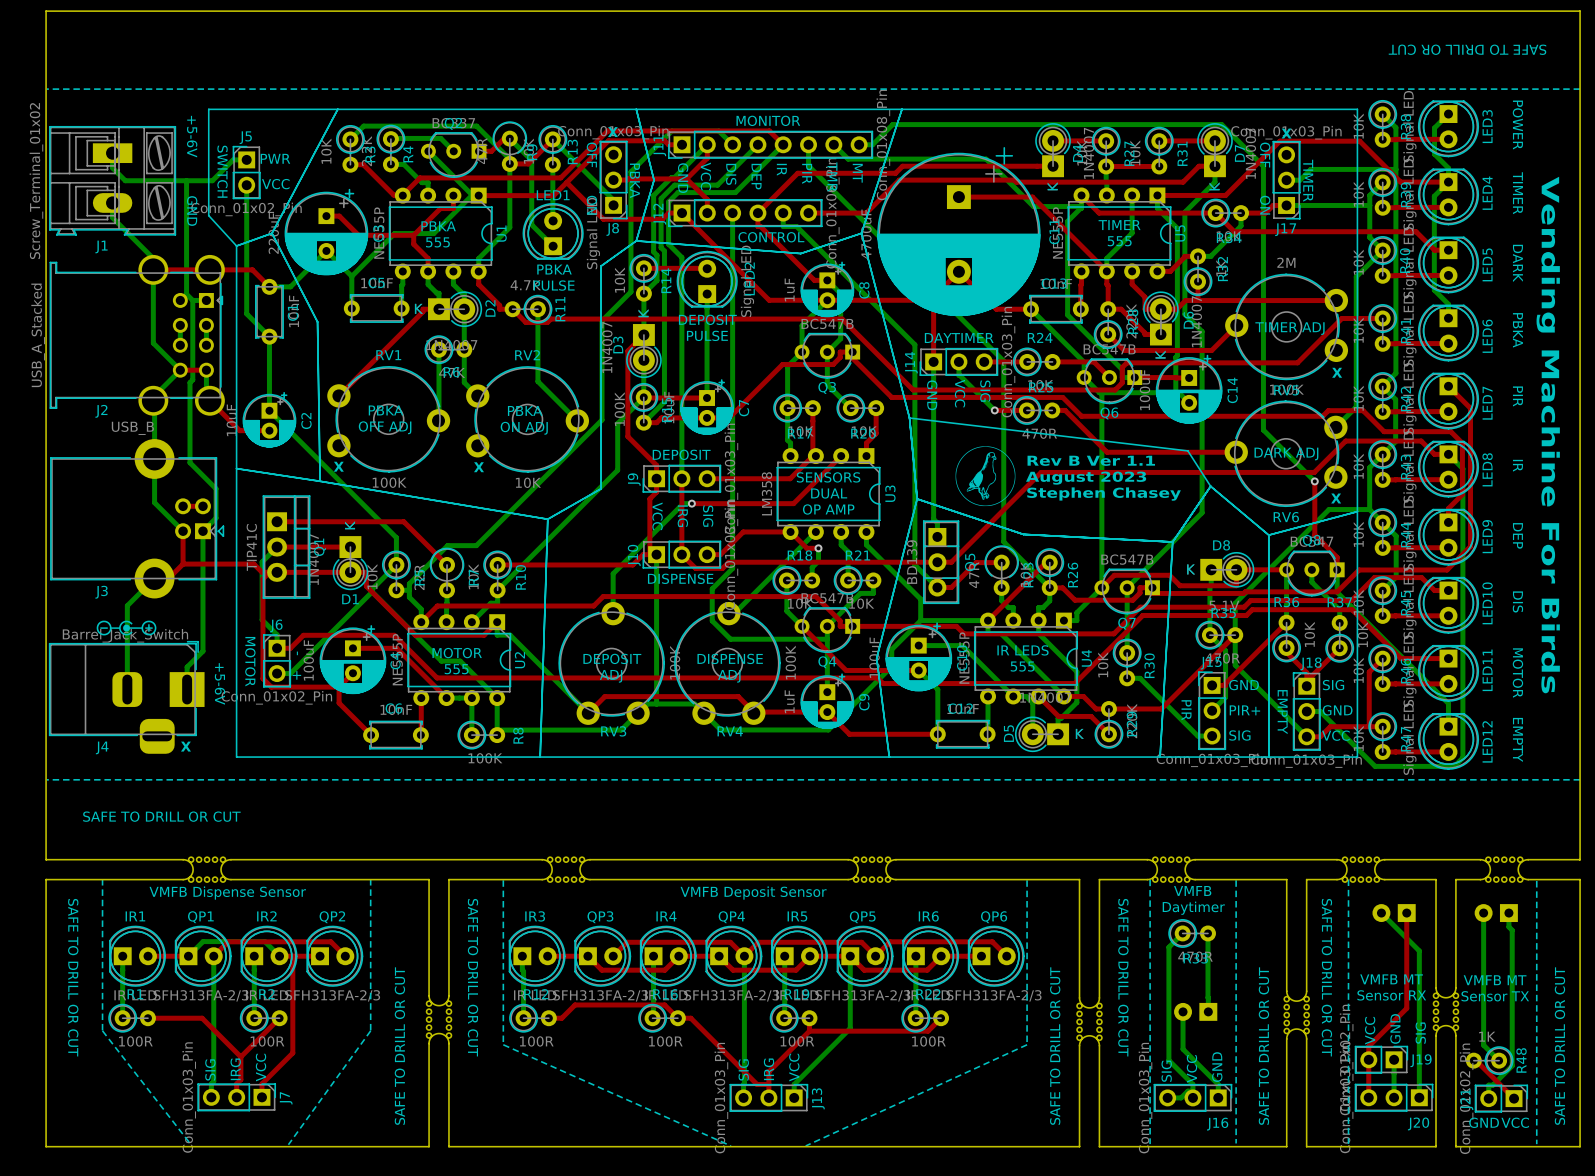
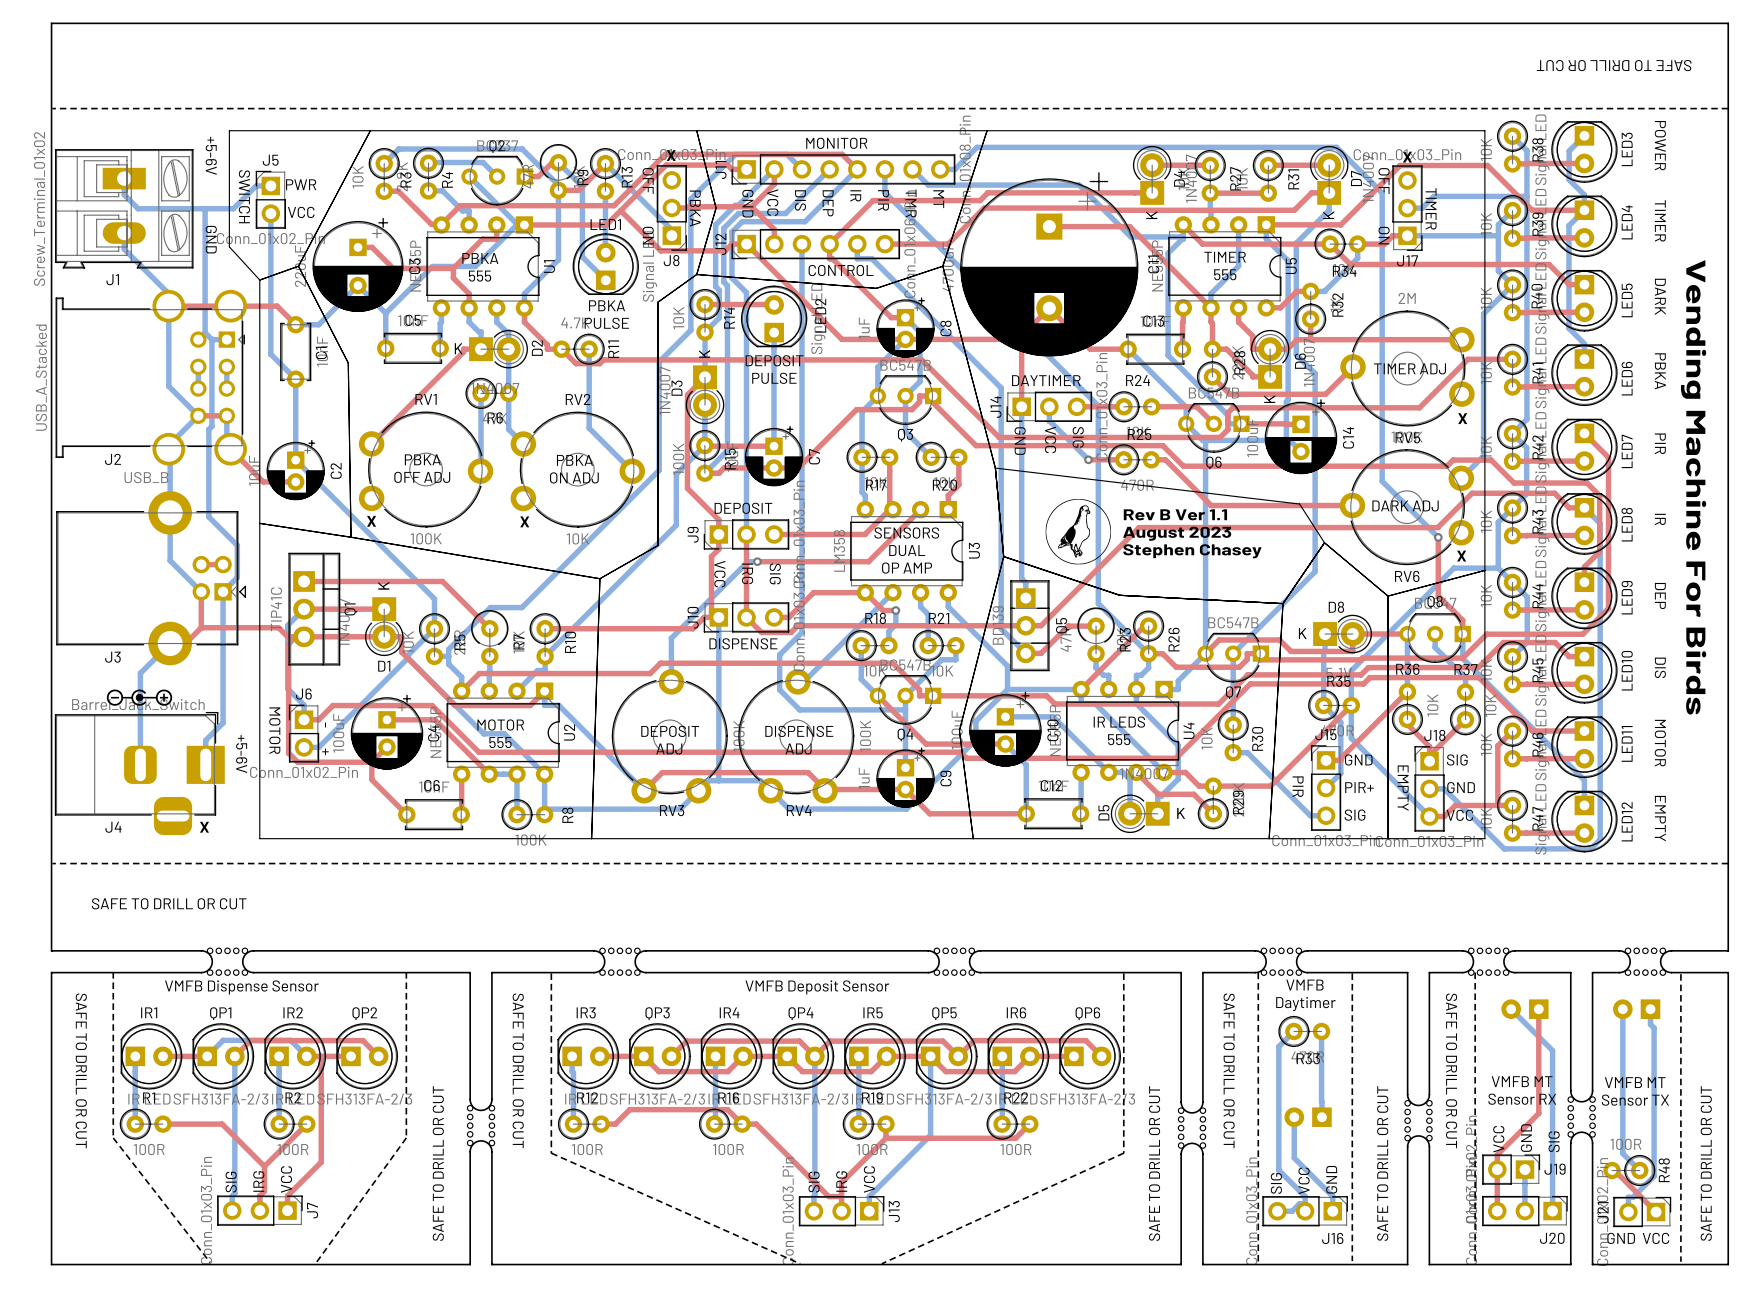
R48 value: 1K (1487, 1036) -> 100R (1625, 1144)

